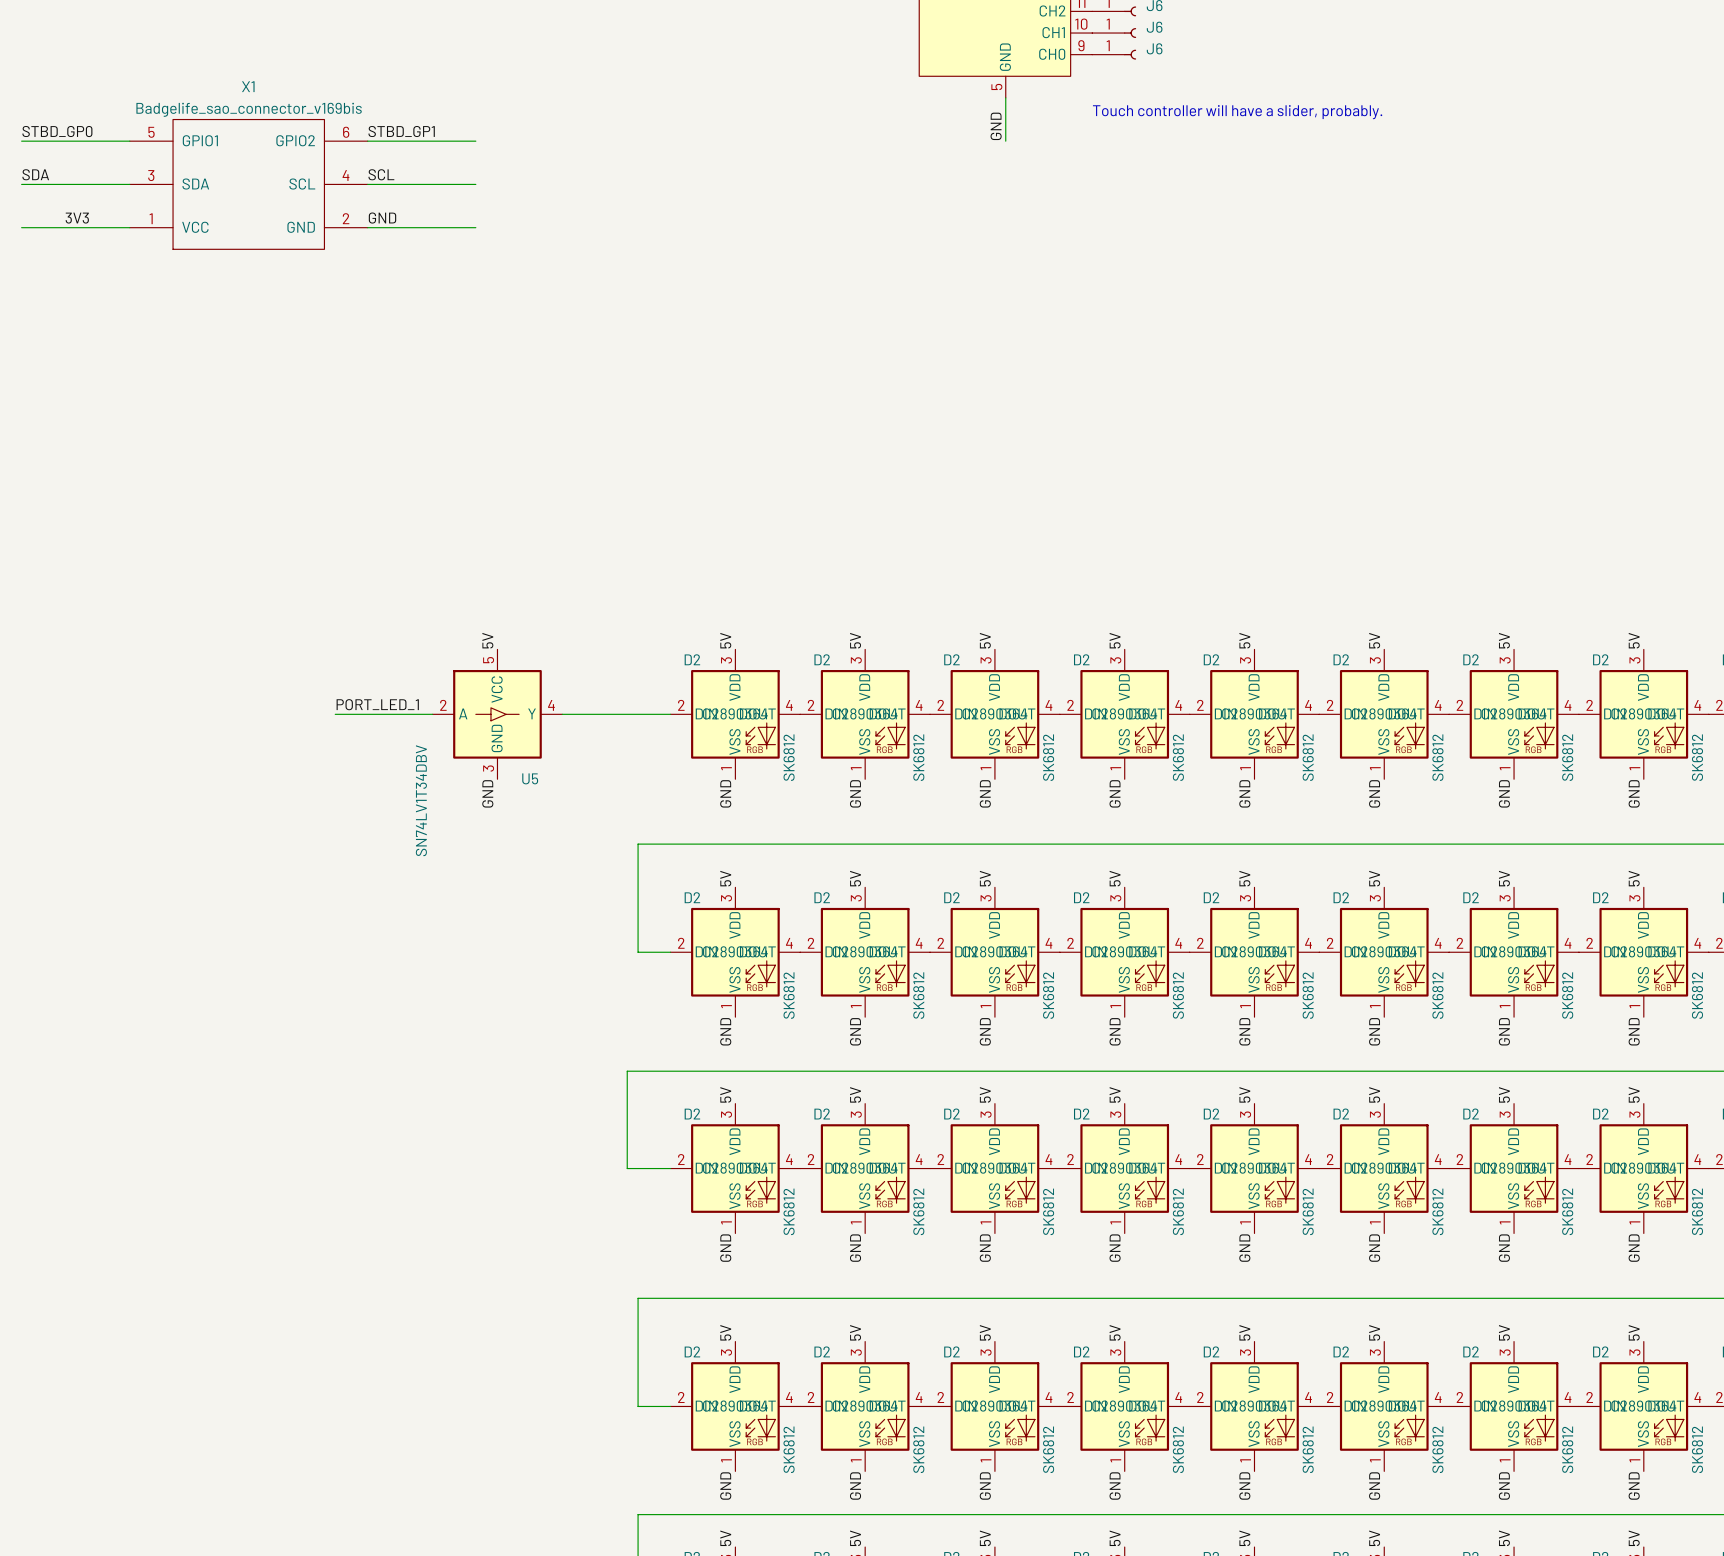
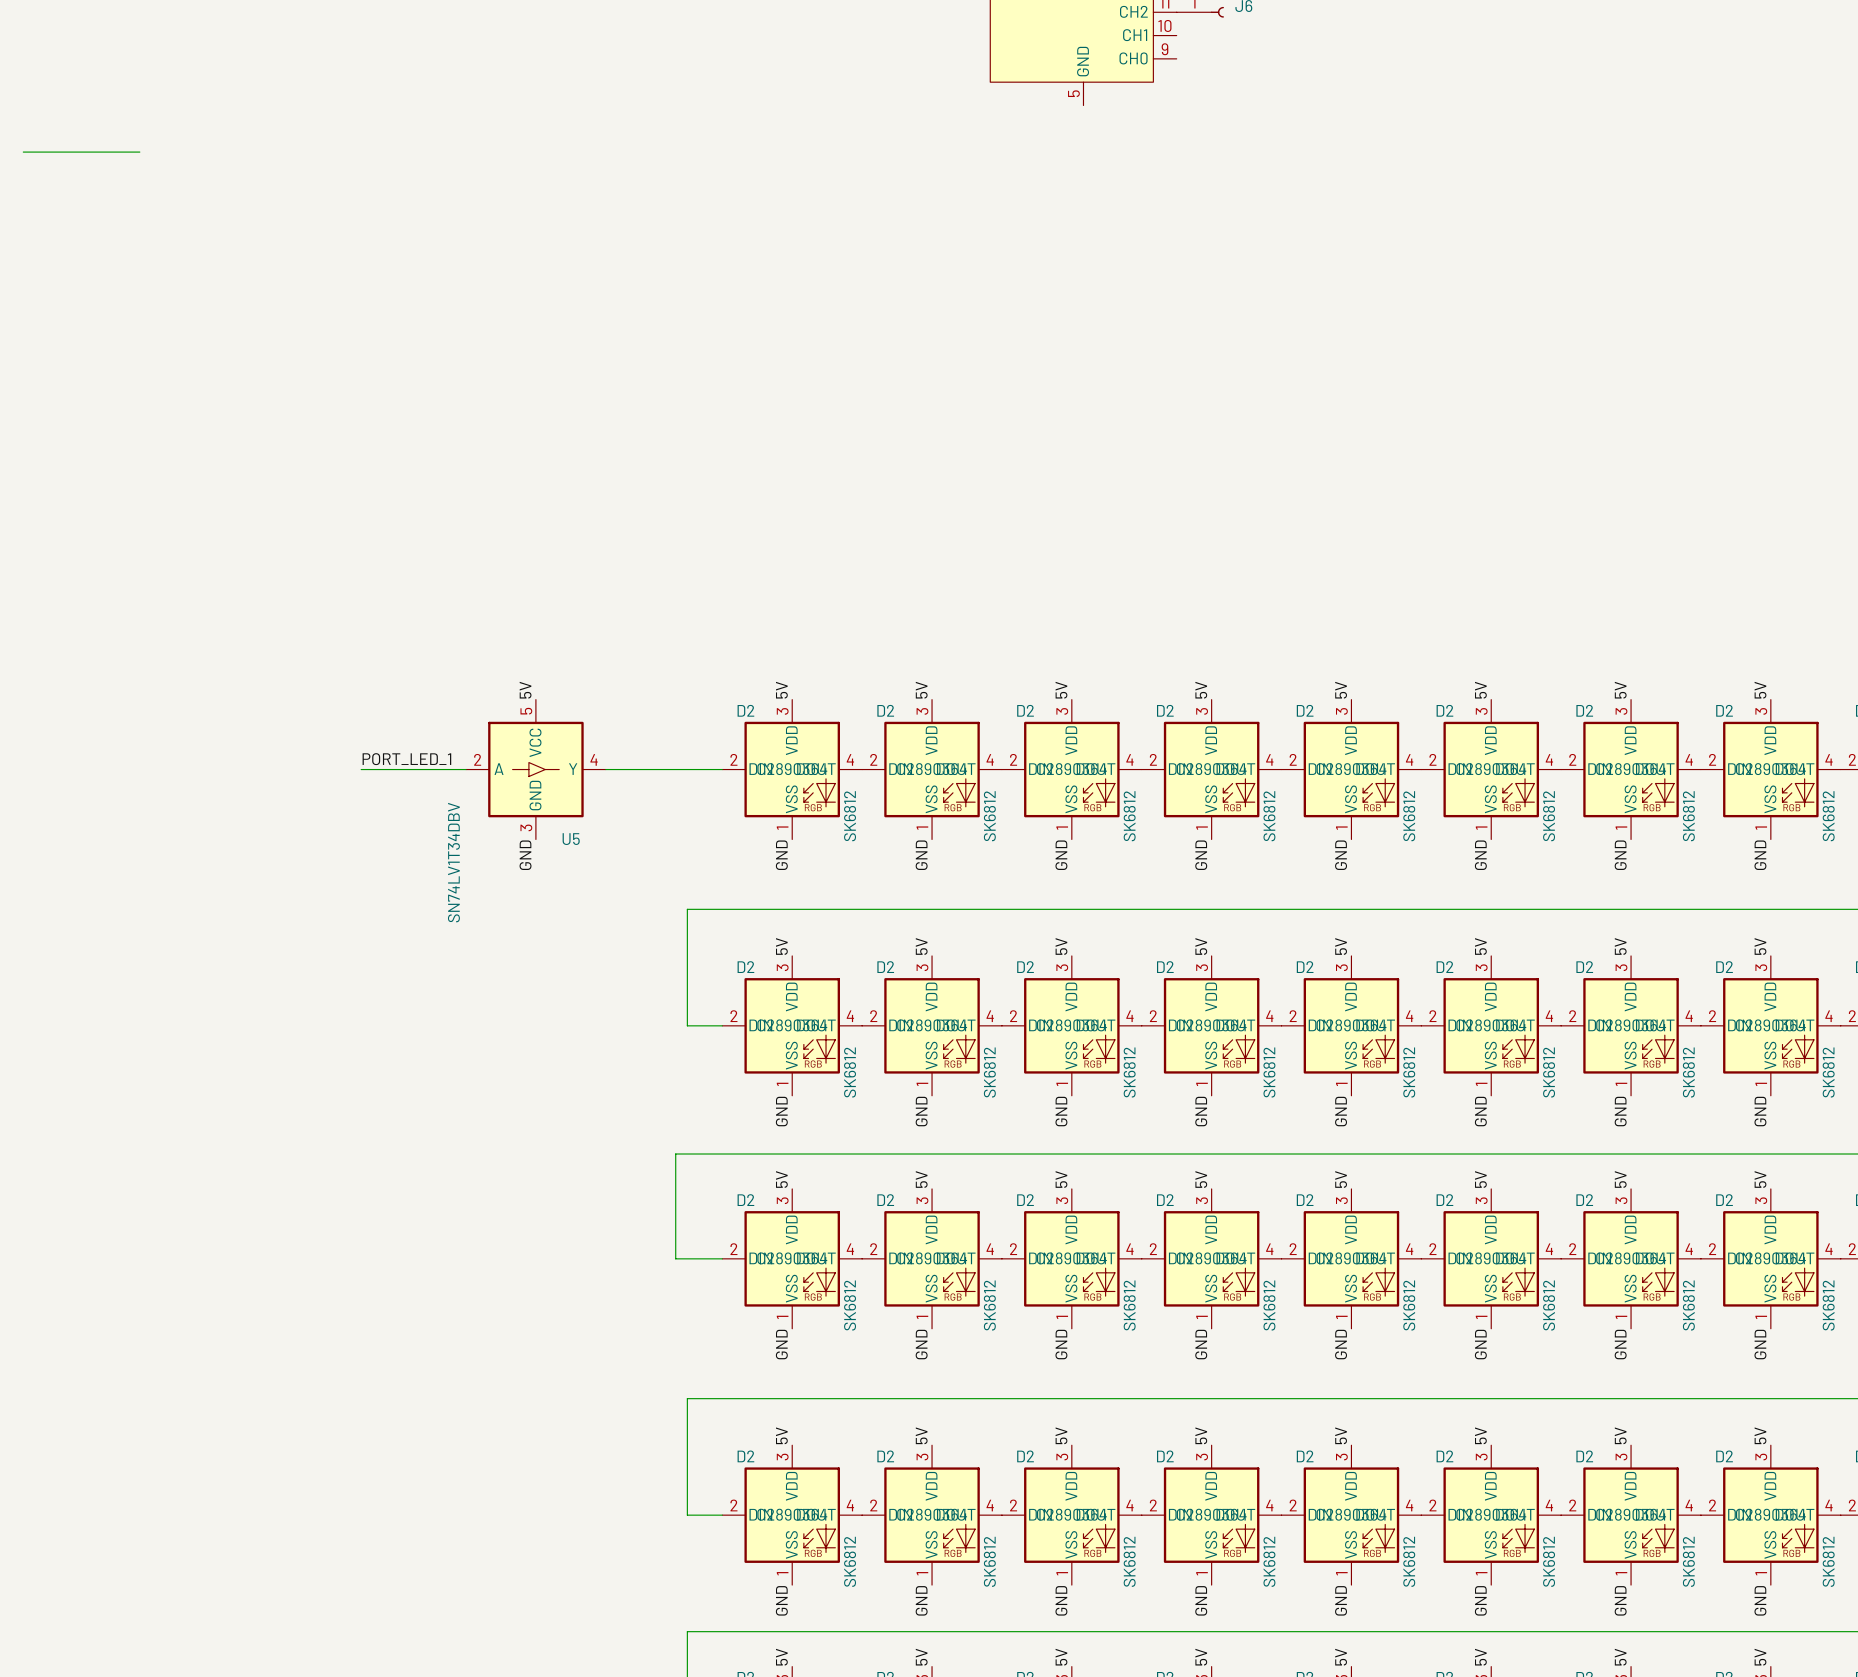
J6: (1114, 33) -> none
J6: (1114, 54) -> none
wire: (1005, 97) (1005, 141) -> none
text: Touch controller will have a slider, probably. (1237, 112) -> none
label: GND (996, 126) -> none
label: STBD_GP0 (57, 131) -> none
label: STBD_GP1 (401, 131) -> none
wire: (367, 141) (475, 141) -> none
label: SDA (35, 174) -> none
label: SCL (381, 174) -> none
wire: (21, 184) (129, 184) -> none
X1: Badgelife_sao_connector_v169bis (248, 184) -> none
wire: (367, 184) (475, 184) -> none
label: 3V3 (77, 218) -> none
label: GND (382, 218) -> none
wire: (21, 227) (129, 227) -> none
wire: (367, 227) (475, 227) -> none

